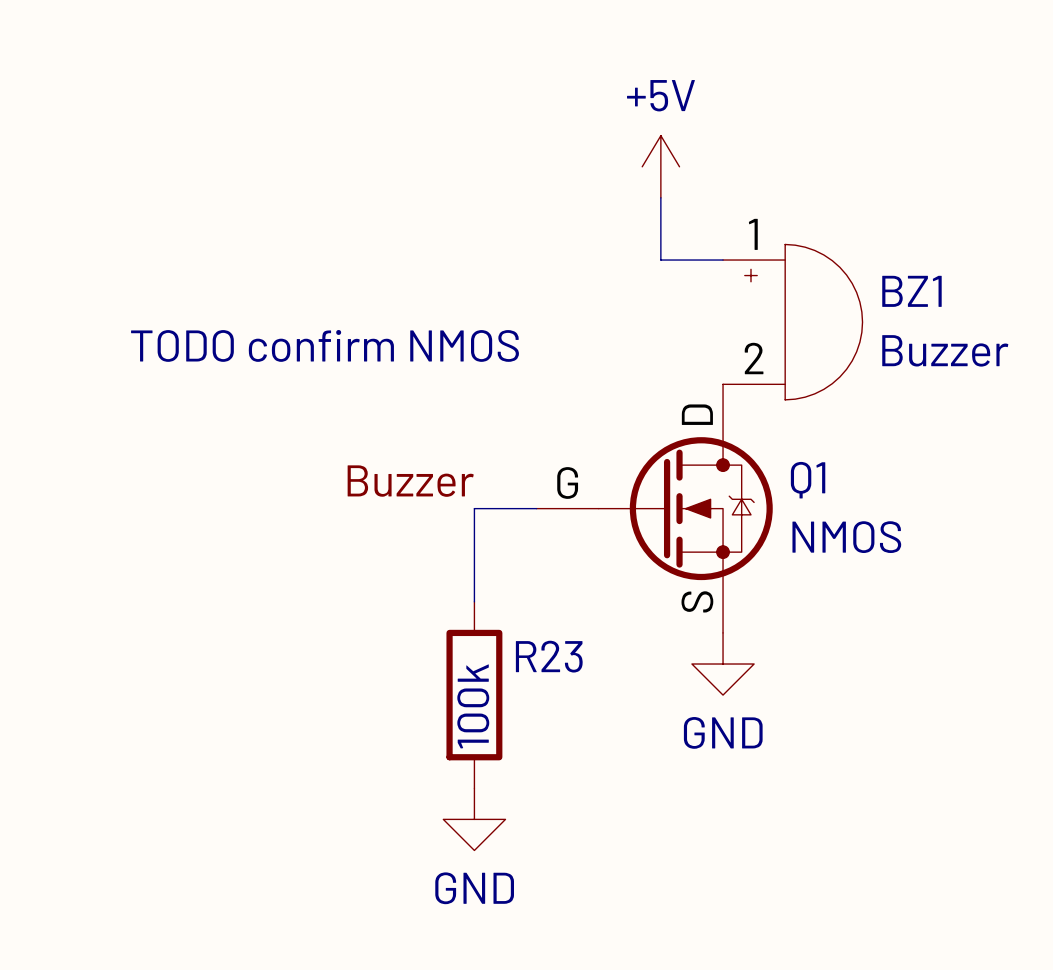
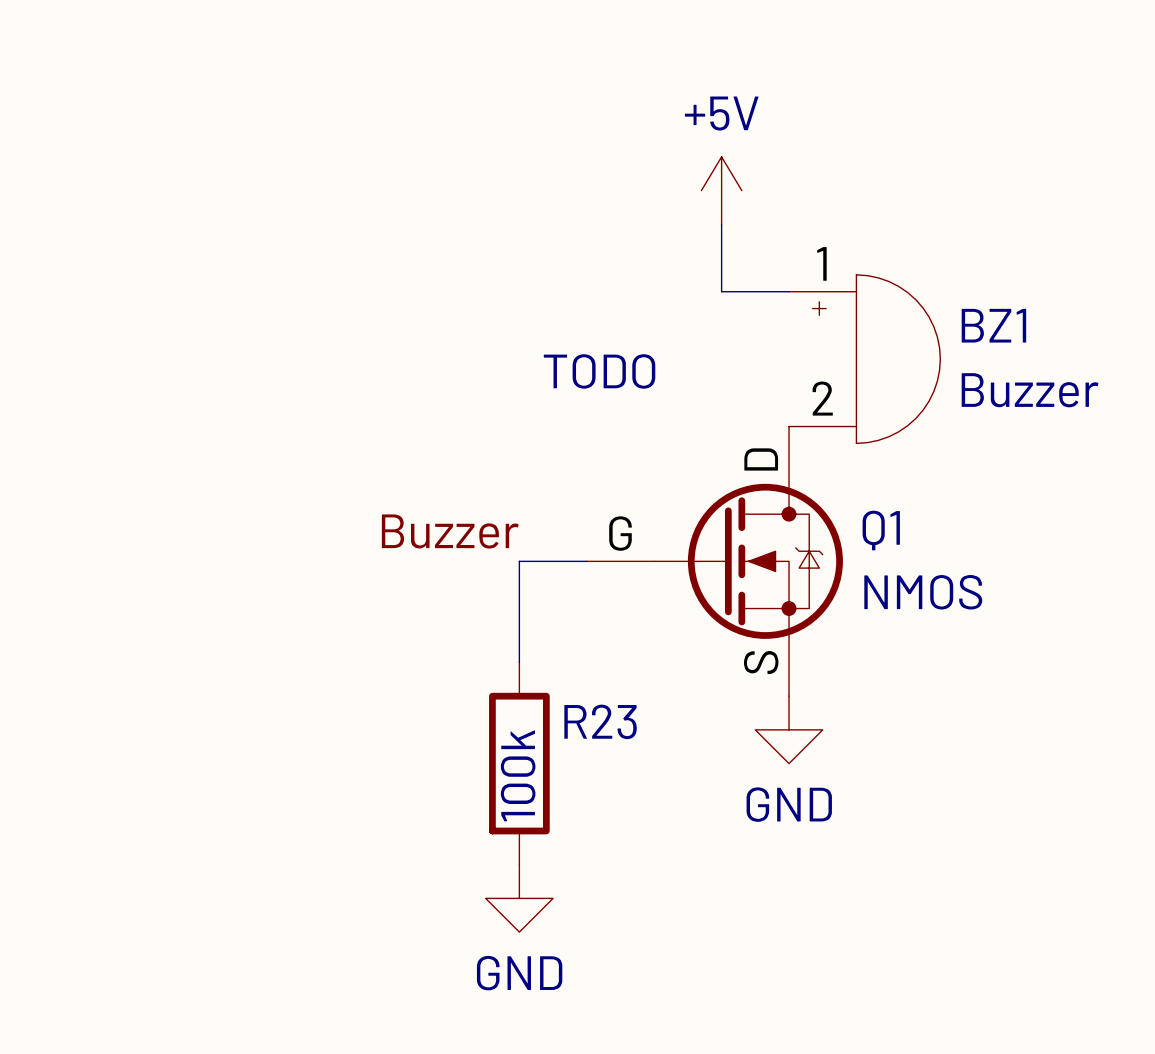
text: none -> TODO (599, 371)
text: TODO confirm NMOS (325, 345) -> none

